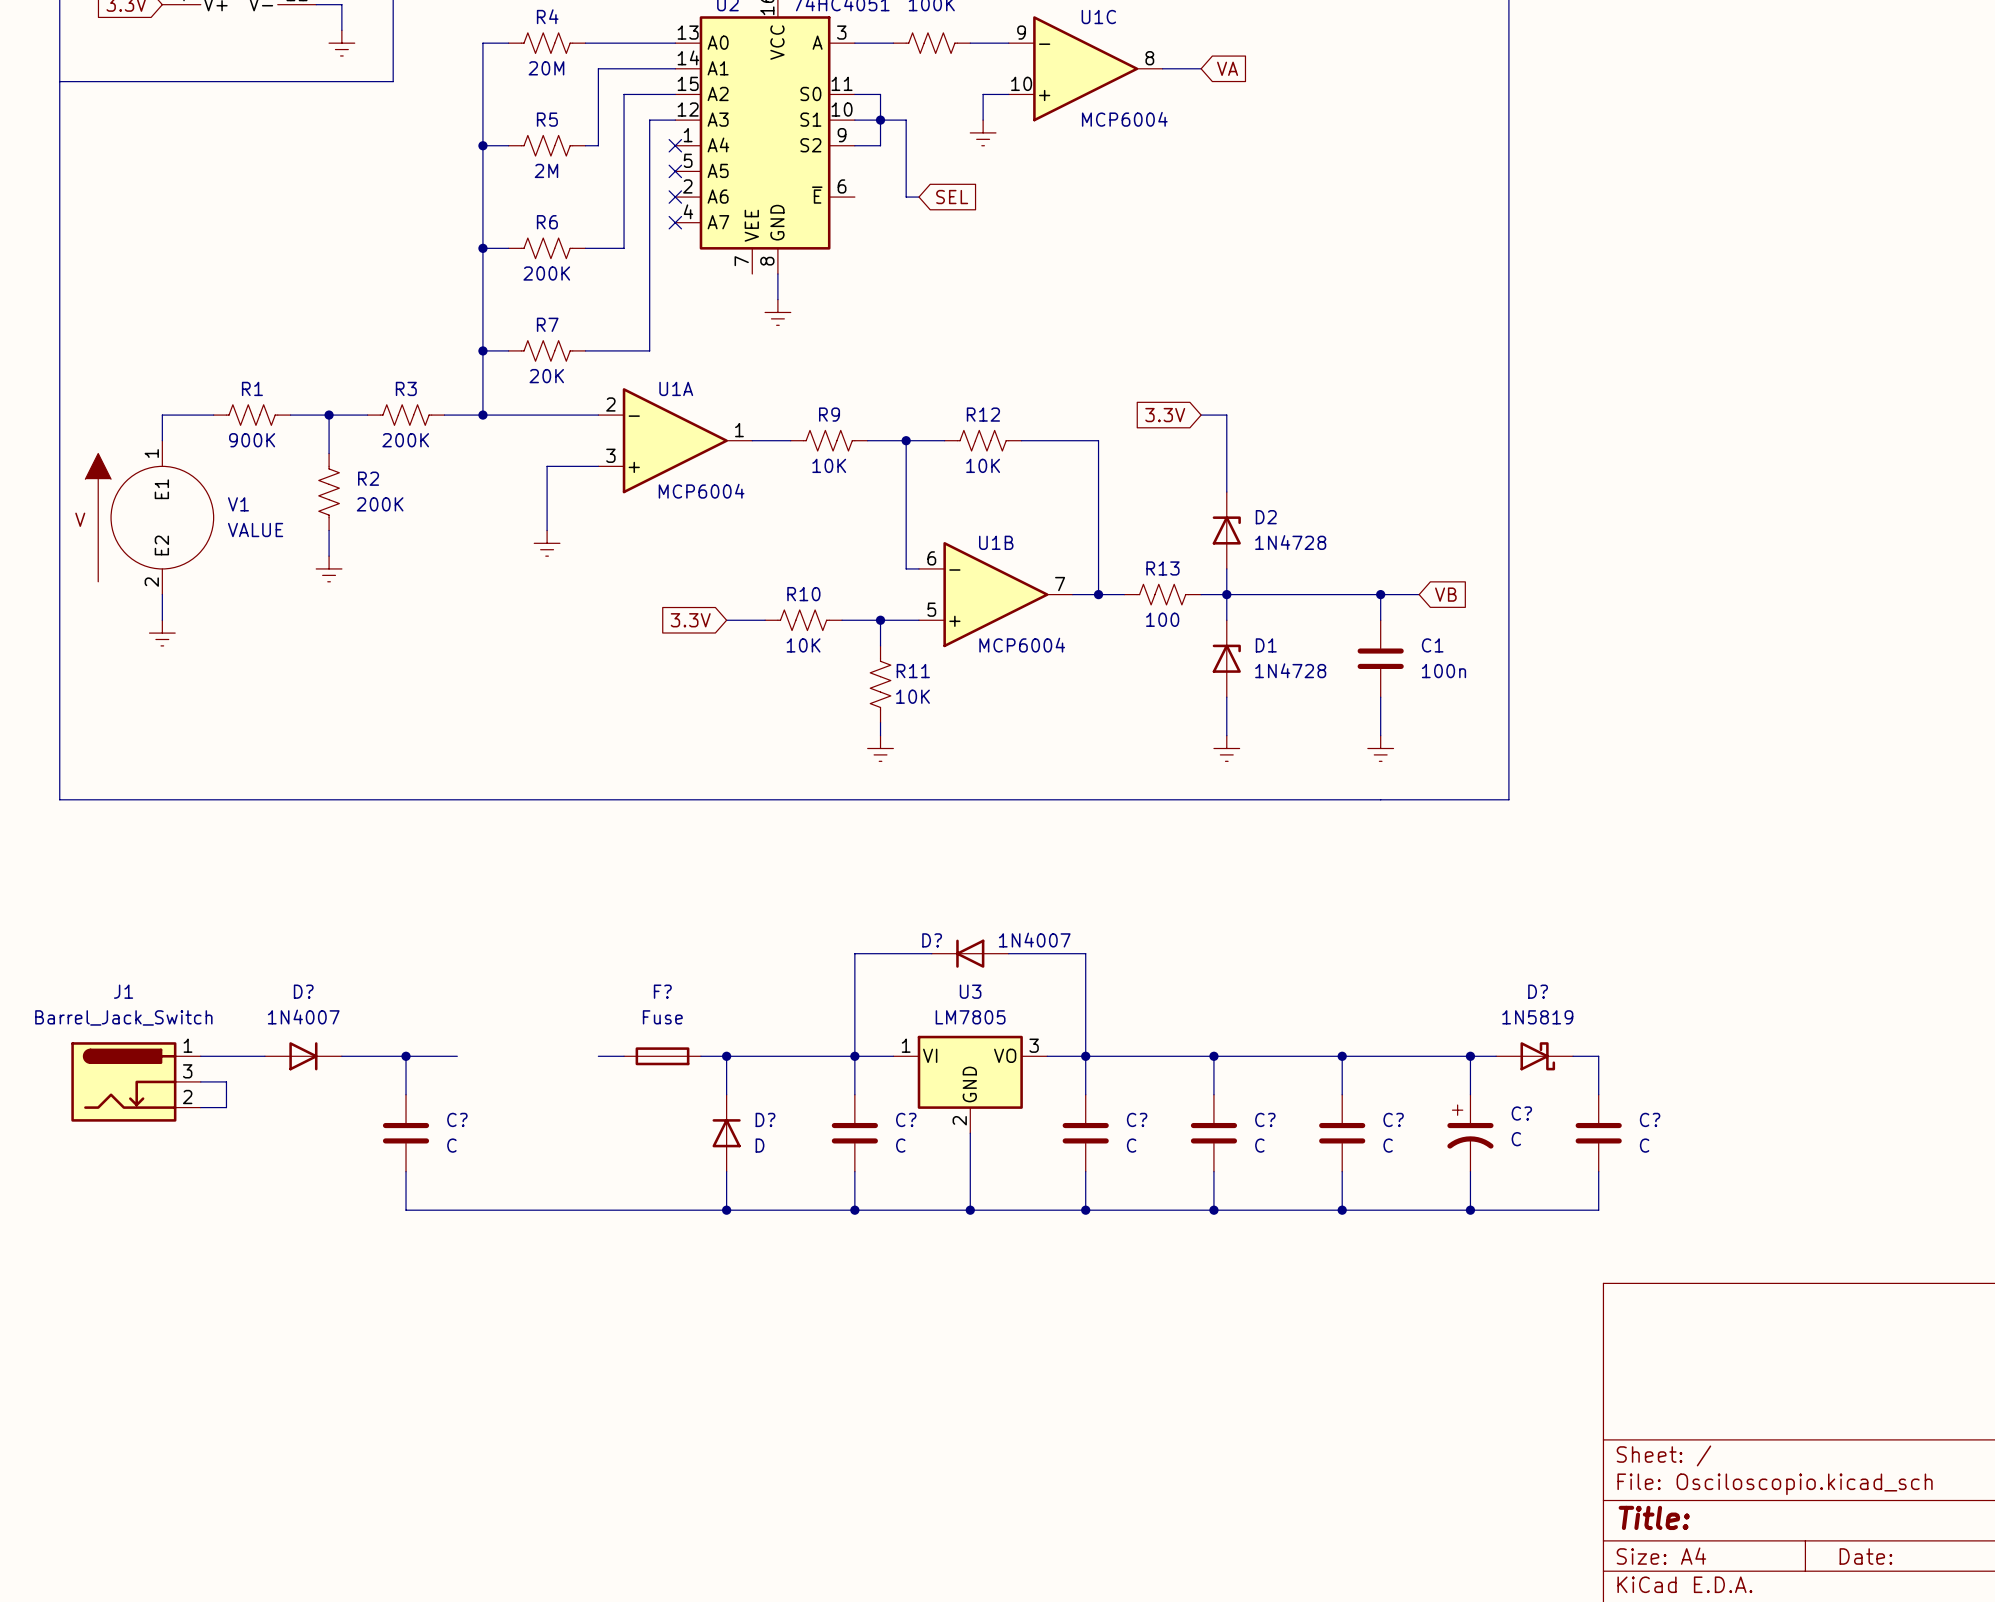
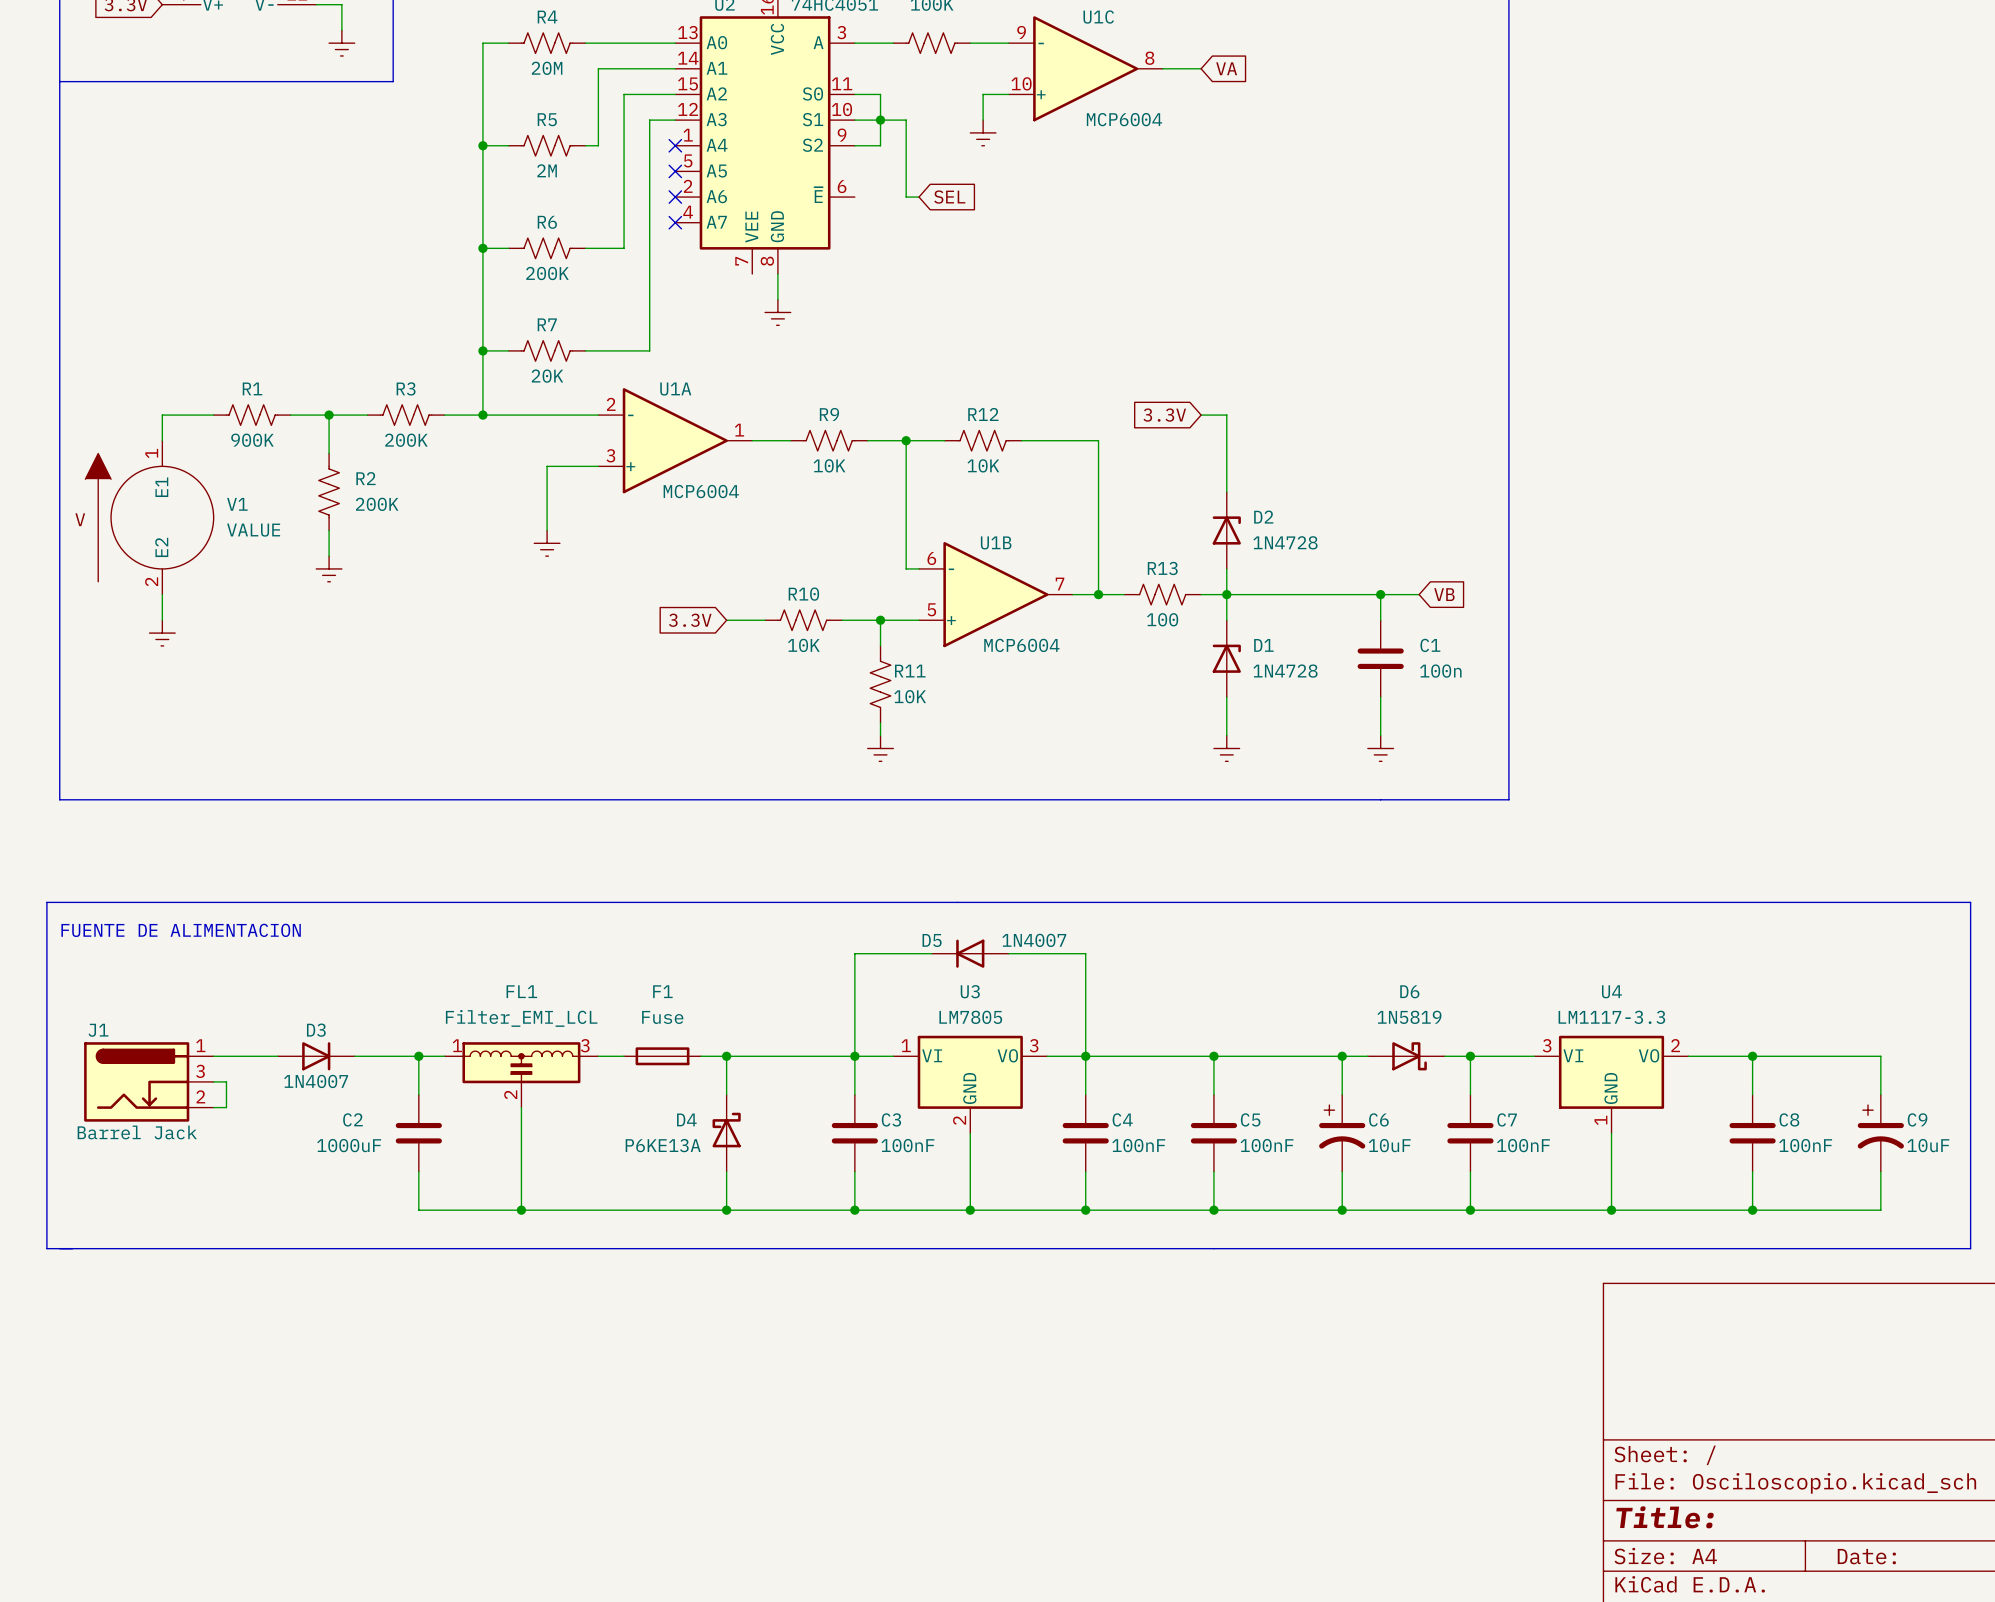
line: none -> (46, 902) (1970, 902) (1970, 1248) (46, 1248) (46, 902)
text: none -> FUENTE DE ALIMENTACION (181, 930)
D? name: D? (932, 940) -> D5 (932, 940)
J1 name position: J1 (123, 991) -> J1 (98, 1030)
F? name: F? (662, 991) -> F1 (662, 991)
J1 value: Barrel_Jack_Switch (123, 1017) -> Barrel Jack (137, 1132)
D?: 1N4007 (303, 1056) -> none
D3: none -> 1N4007 (316, 1056)
wire: (406, 1056) (406, 1094) -> (418, 1056) (418, 1094)
junction position: (406, 1056) -> (418, 1056)
D6: none -> 1N5819 (1406, 1056)
D?: 1N5819 (1534, 1056) -> none
wire: none -> (1688, 1056) (1880, 1056) (1880, 1094)
wire: none -> (1752, 1056) (1752, 1094)
junction: none -> (1752, 1056)
FL1: none -> Filter_EMI_LCL (521, 1074)
J1 position: (136, 1081) -> (148, 1081)
U4: none -> LM1117-3.3 (1611, 1084)
wire: none -> (521, 1107) (521, 1210)
C? name: C? (906, 1119) -> C3 (891, 1119)
C? name: C? (1137, 1119) -> C4 (1122, 1119)
C? name: C? (1265, 1119) -> C5 (1250, 1119)
C?: C (406, 1133) -> none
C2: none -> 1000uF (418, 1133)
D?: D (726, 1133) -> none
D4: none -> P6KE13A (726, 1133)
C?: C (1342, 1133) -> none
C6: none -> 10uF (1342, 1133)
C?: C (1470, 1133) -> none
C7: none -> 100nF (1470, 1133)
C?: C (1598, 1133) -> none
wire: none -> (1611, 1133) (1611, 1210)
C8: none -> 100nF (1752, 1133)
C9: none -> 10uF (1880, 1133)
C? value: C (900, 1145) -> 100nF (907, 1145)
C? value: C (1131, 1145) -> 100nF (1138, 1145)
C? value: C (1259, 1145) -> 100nF (1267, 1145)
wire: (406, 1171) (406, 1210) (418, 1210) -> (418, 1171) (418, 1210)
wire: (1598, 1171) (1598, 1210) -> (1880, 1171) (1880, 1210) (1598, 1210)
wire: none -> (1752, 1171) (1752, 1210)
junction: none -> (521, 1210)
junction: none -> (1611, 1210)
junction: none -> (1752, 1210)

